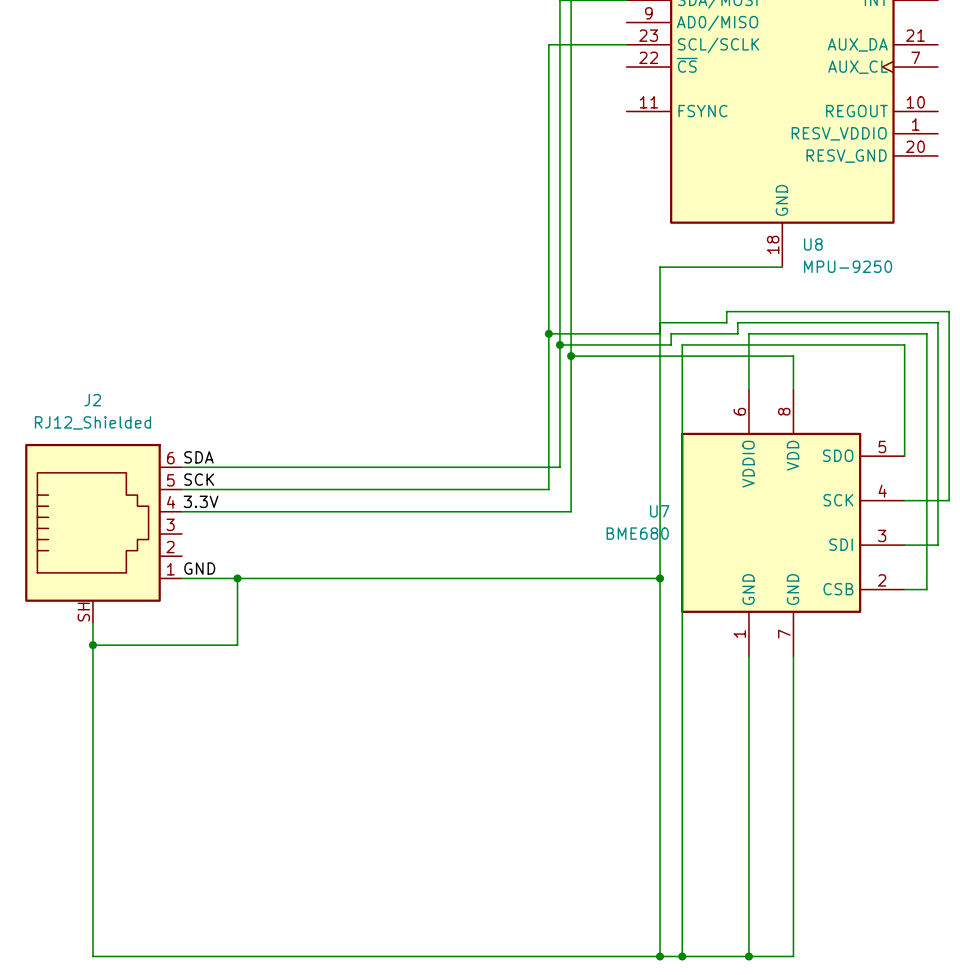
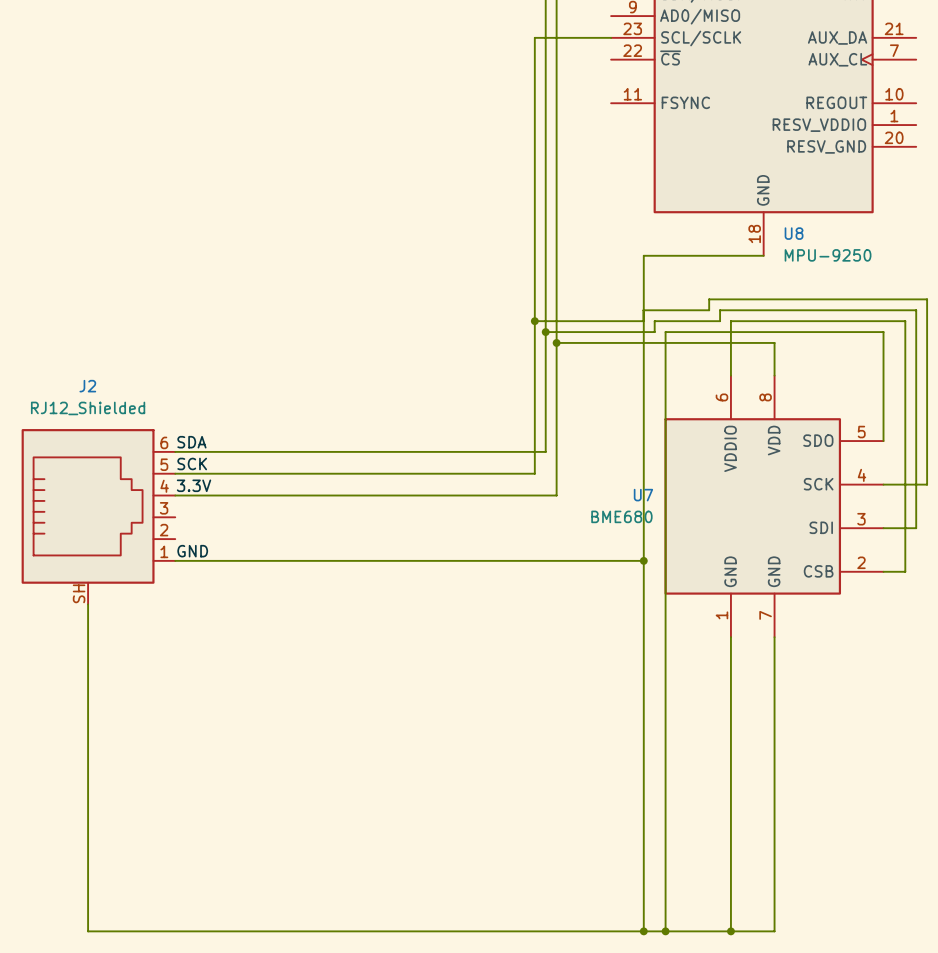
wire: (237, 578) (237, 645) (92, 645) -> none
junction: (237, 578) -> none
junction: (92, 645) -> none

